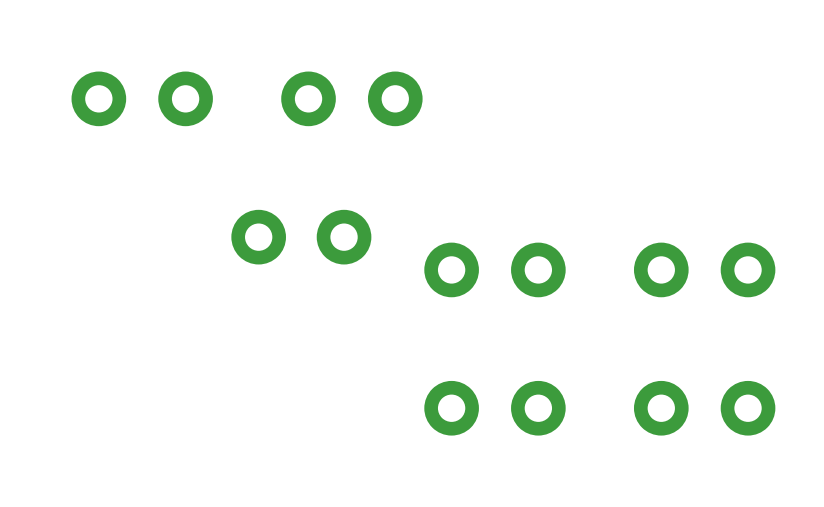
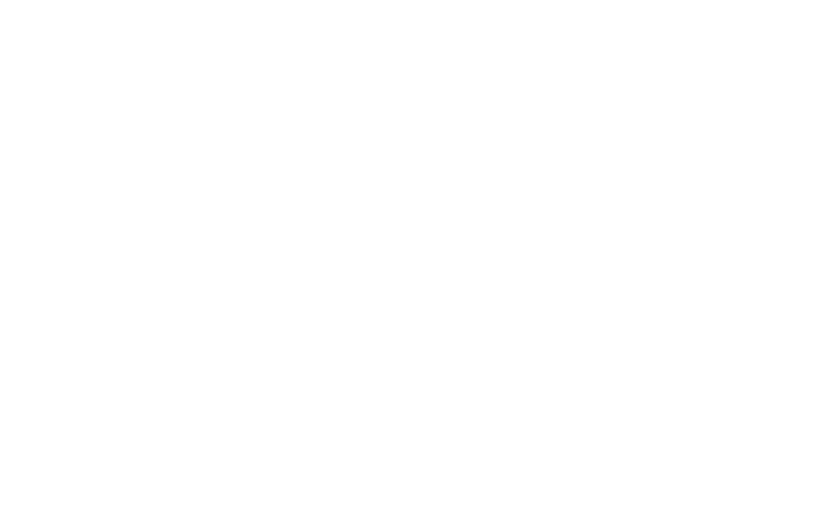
part: (142, 98) -> none
part: (351, 98) -> none
part: (301, 237) -> none
part: (494, 269) -> none
part: (704, 269) -> none
part: (494, 408) -> none
part: (704, 408) -> none

